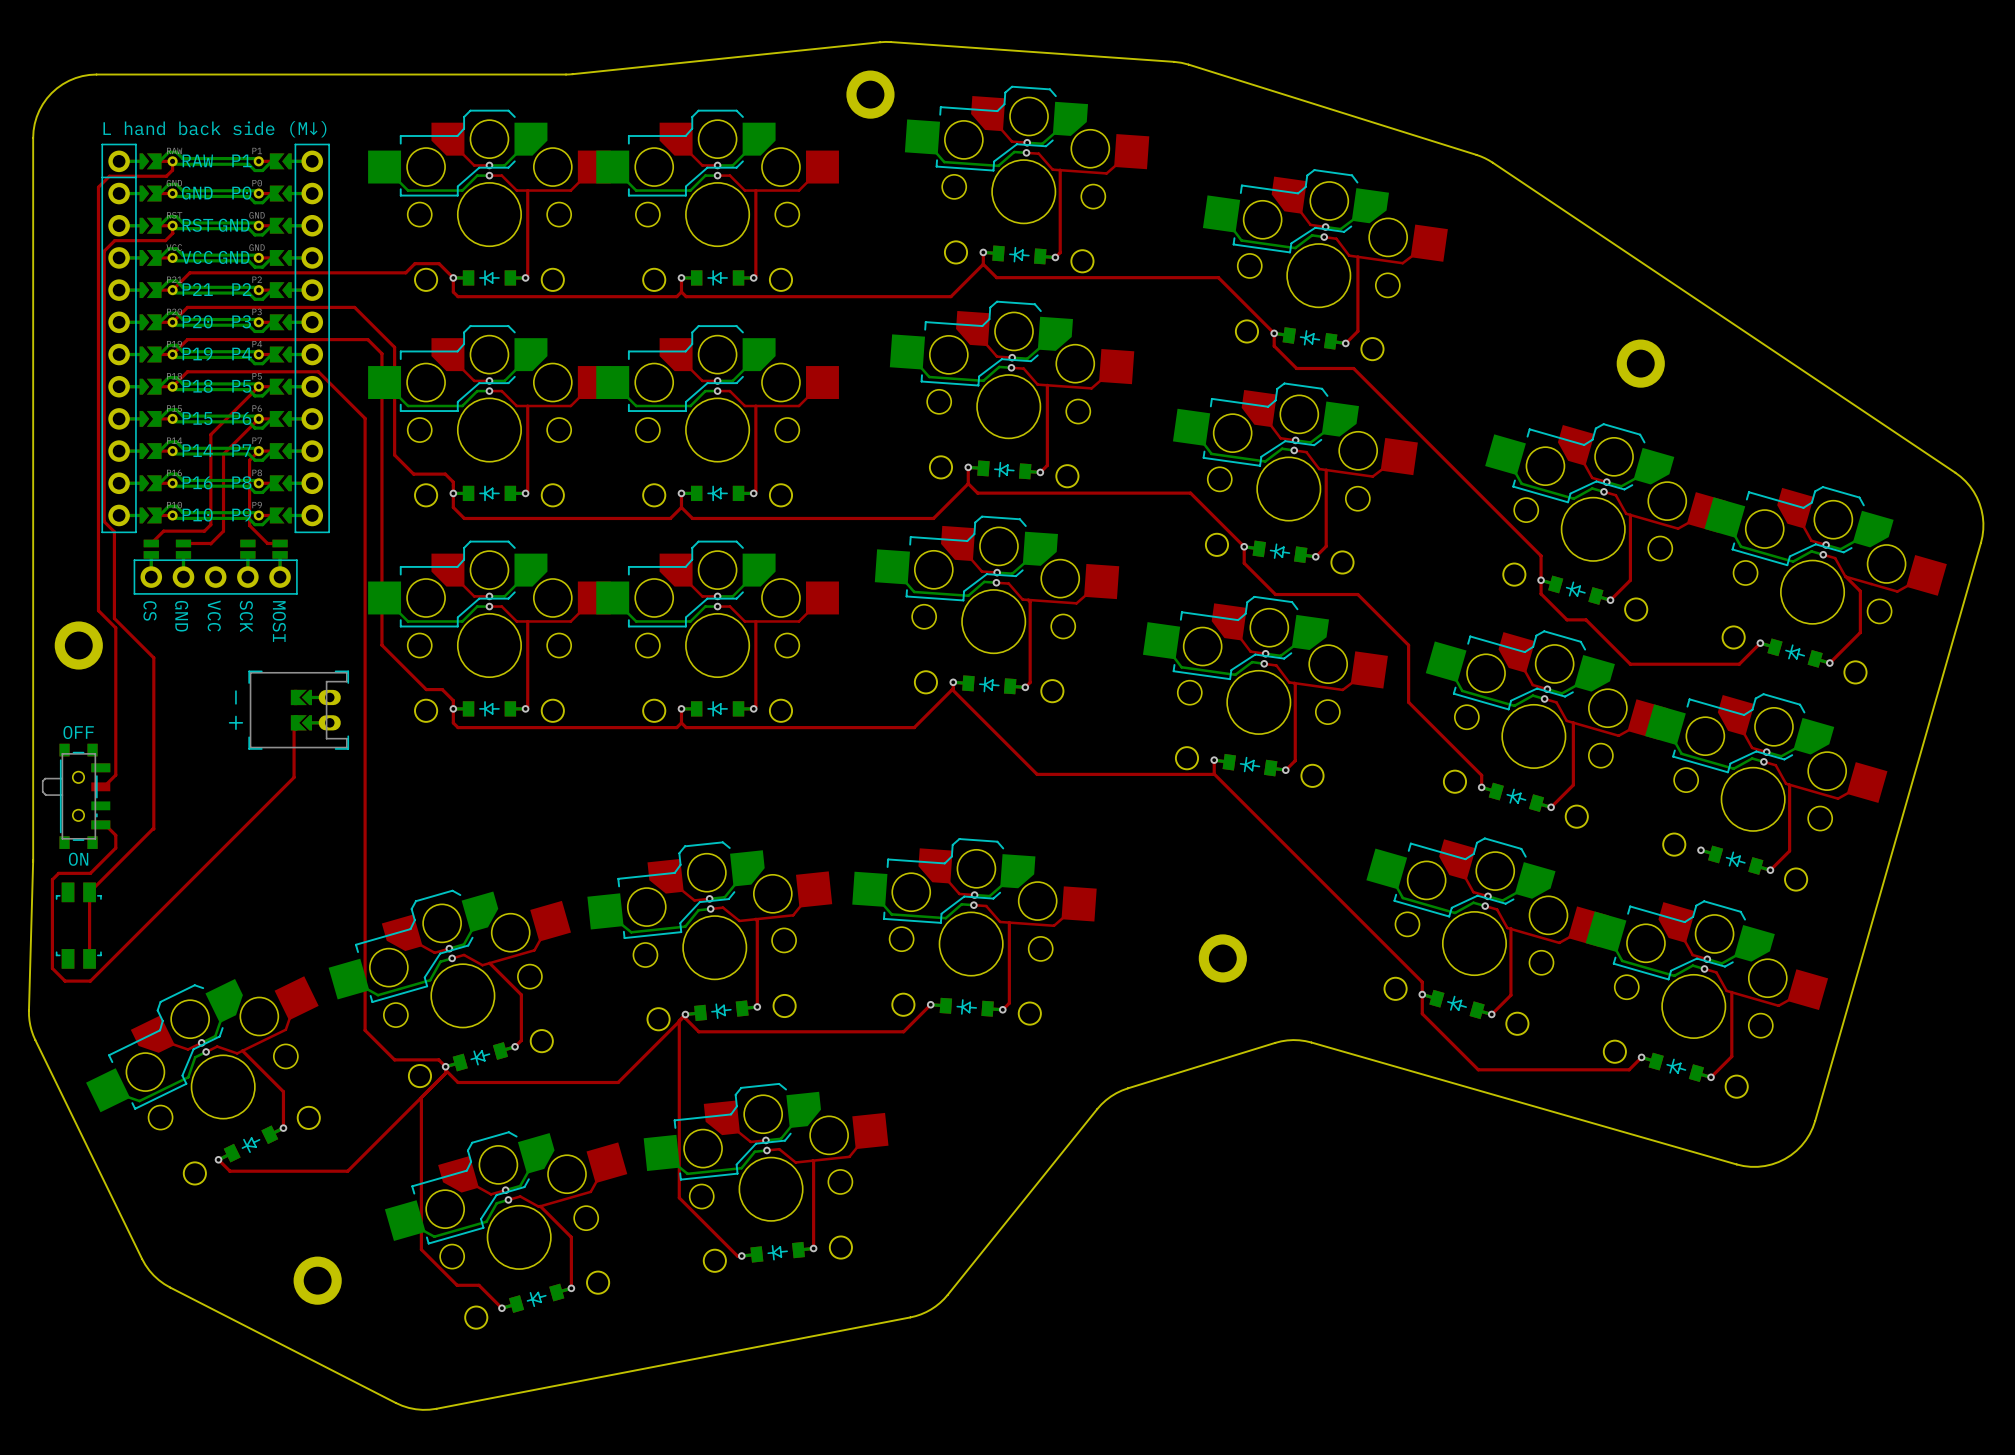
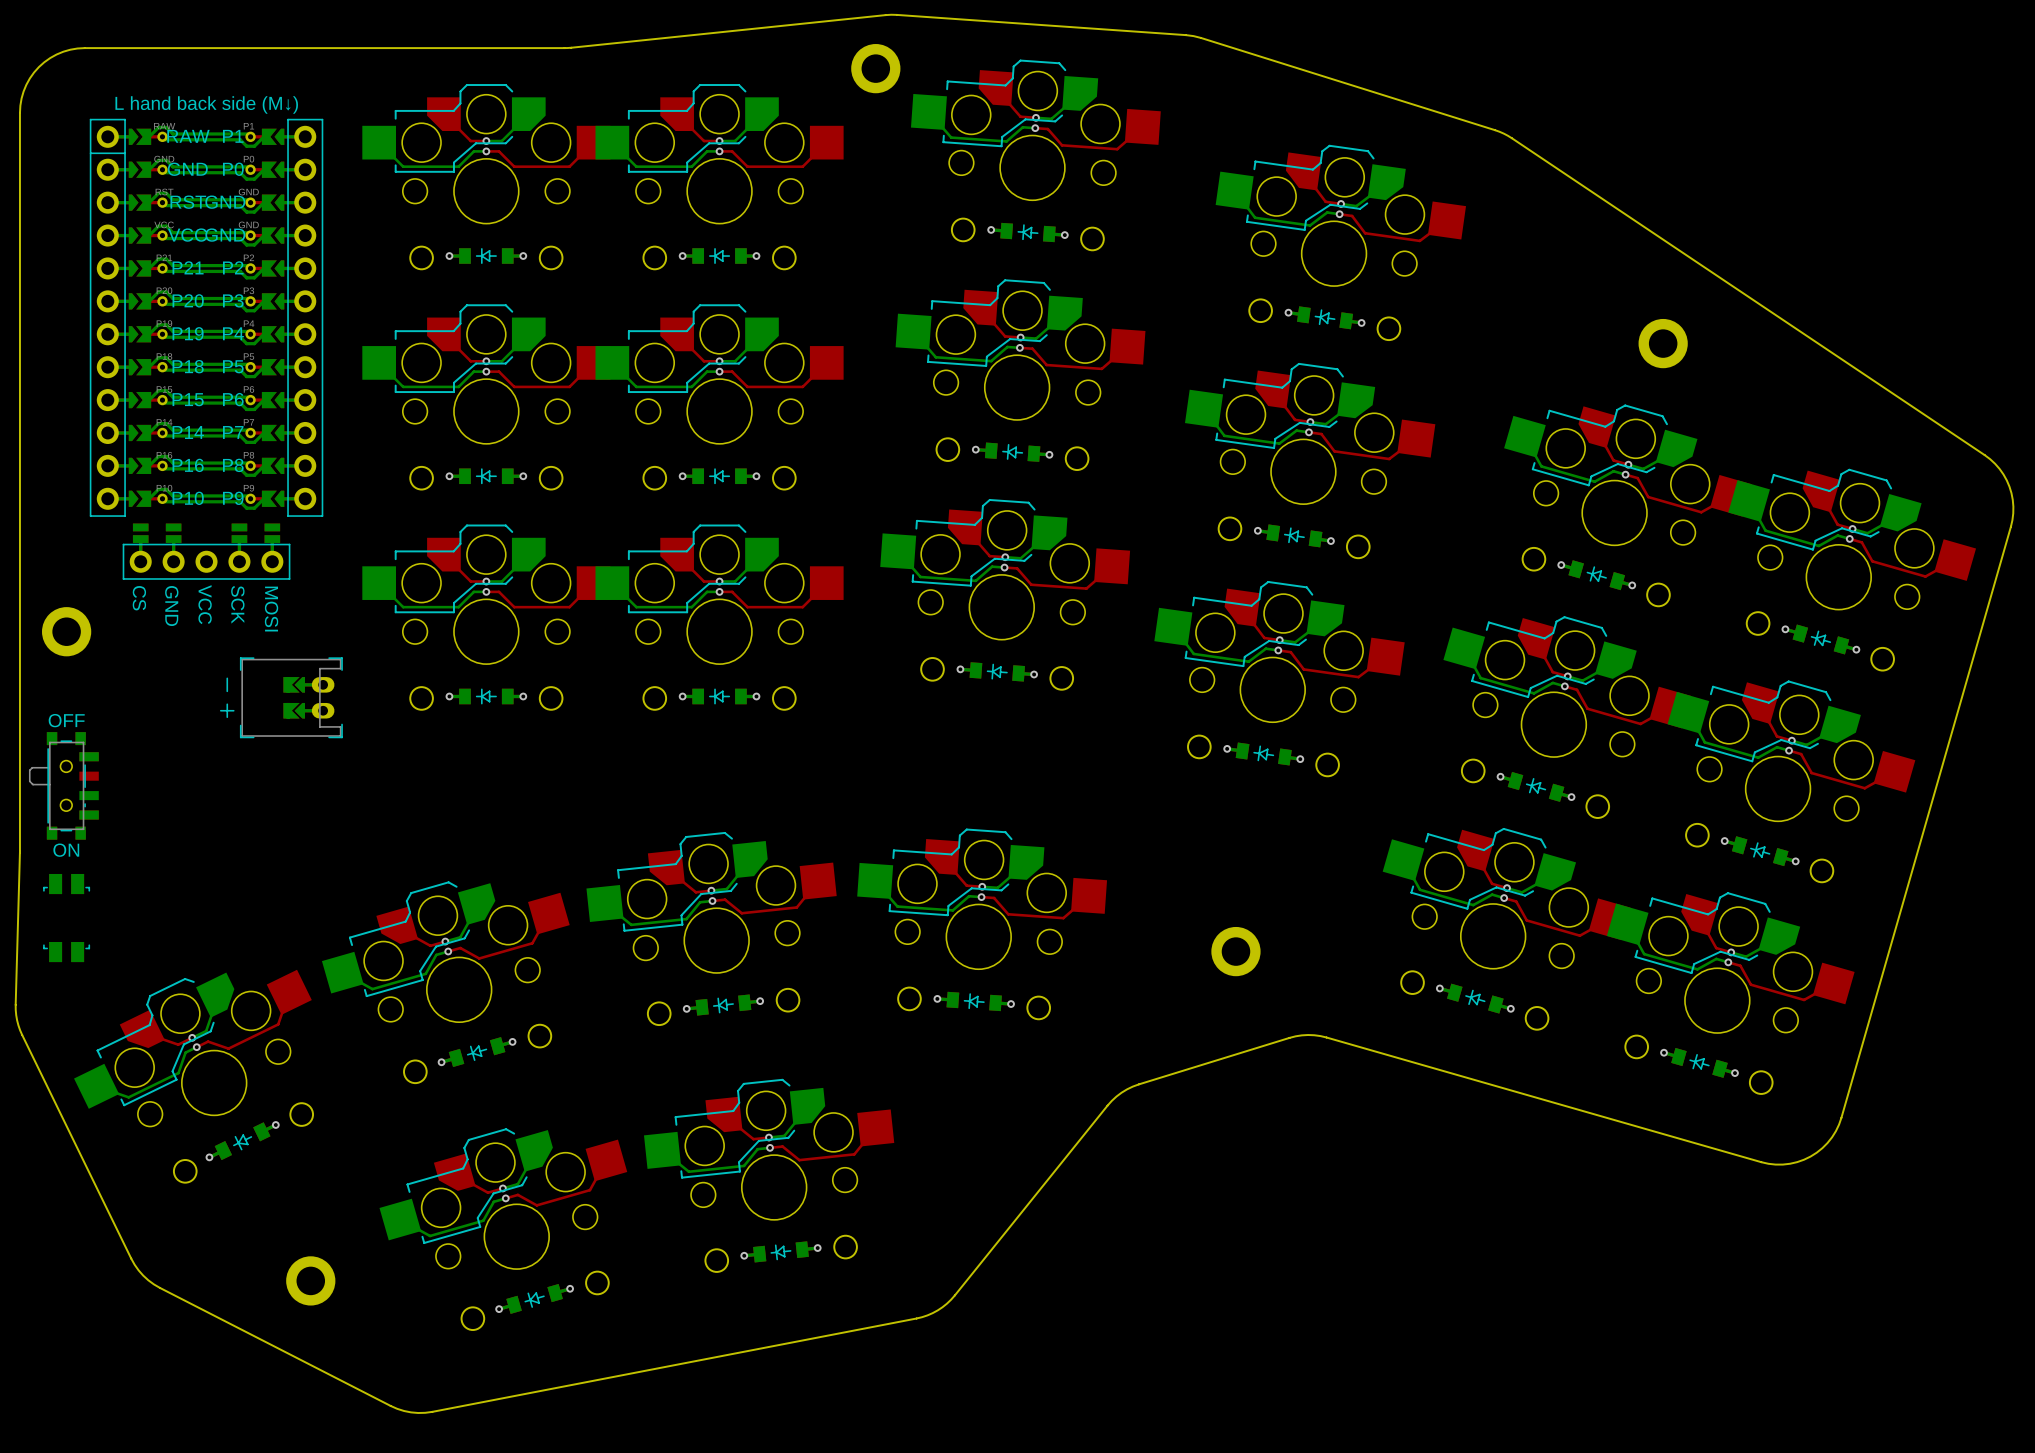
top track: (172, 161) (172, 170) (166, 176) (109, 176) (98, 187) (98, 610) (115, 627) (115, 775) (103, 786) (100, 786) -> none
top track: (1060, 170) (1060, 252) (1055, 257) -> none
top track: (527, 190) (527, 275) (525, 277) -> none
top track: (755, 190) (755, 275) (753, 277) -> none
top track: (172, 225) (172, 233) (165, 240) (114, 240) (104, 251) (104, 521) (114, 531) (114, 618) (153, 657) (153, 829) (89, 892) (89, 958) -> none
top track: (983, 252) (983, 264) -> none
top track: (1357, 256) (1357, 331) (1345, 343) -> none
top track: (983, 264) (996, 277) (1218, 277) (1274, 333) (1274, 346) (1296, 368) (1353, 368) (1541, 555) (1541, 593) (1567, 619) (1586, 619) (1630, 664) (1739, 664) (1760, 643) -> none
top track: (983, 264) (950, 296) (686, 296) (681, 291) -> none
top track: (681, 277) (681, 291) -> none
top track: (172, 290) (189, 272) (405, 272) (414, 263) (439, 263) (453, 277) (453, 291) (458, 296) (676, 296) (681, 291) -> none
top track: (172, 322) (187, 307) (354, 307) (394, 347) (394, 455) (413, 474) (445, 474) (453, 482) (453, 507) (464, 518) (670, 518) (681, 507) -> none
top track: (172, 354) (187, 339) (367, 339) (381, 353) (381, 645) (426, 689) (442, 689) (453, 700) (453, 722) (458, 727) (676, 727) (681, 722) -> none
top track: (1047, 385) (1047, 465) (1040, 472) -> none
top track: (172, 386) (187, 371) (318, 371) (365, 418) (365, 1030) (394, 1059) (438, 1059) (445, 1066) (445, 1073) (347, 1171) (229, 1171) -> none
top track: (258, 386) (210, 434) (210, 524) (204, 531) (163, 531) (151, 543) -> none
top track: (527, 406) (527, 491) (525, 493) -> none
top track: (755, 406) (755, 491) (753, 493) -> none
top track: (258, 418) (223, 454) (223, 531) (210, 543) (183, 543) -> none
top track: (258, 451) (249, 460) (249, 525) (267, 543) (280, 543) -> none
top track: (968, 467) (968, 483) -> none
top track: (1326, 470) (1326, 546) (1315, 556) -> none
top track: (968, 483) (977, 493) (1190, 493) (1244, 546) (1244, 563) (1275, 594) (1357, 594) (1408, 645) (1408, 702) (1481, 775) (1481, 787) -> none
top track: (968, 483) (933, 518) (692, 518) (681, 507) -> none
top track: (681, 493) (681, 507) -> none
top track: (1630, 514) (1630, 580) (1610, 600) -> none
top track: (1845, 576) (1860, 591) (1860, 632) (1829, 663) -> none
top track: (1028, 599) (1030, 601) (1030, 682) (1025, 687) -> none
top track: (527, 621) (527, 706) (525, 708) -> none
top track: (755, 621) (755, 706) (753, 708) -> none
top track: (953, 682) (953, 688) (914, 727) (686, 727) (681, 722) -> none
top track: (1294, 683) (1295, 760) (1285, 770) -> none
top track: (952, 689) (1037, 774) (1214, 774) -> none
top track: (679, 707) (681, 722) -> none
top track: (294, 722) (294, 777) (90, 981) (65, 981) (52, 968) (52, 879) (58, 873) (90, 873) (115, 848) (115, 835) (105, 824) (100, 824) -> none
top track: (1573, 722) (1573, 785) (1551, 807) -> none
top track: (1214, 760) (1214, 774) -> none
top track: (1214, 774) (1422, 982) (1422, 1013) (1478, 1069) (1629, 1069) (1641, 1057) -> none
top track: (1788, 784) (1789, 851) (1770, 870) -> none
top track: (755, 919) (757, 1006) -> none
top track: (1009, 922) (1009, 1003) (1002, 1009) -> none
top track: (1510, 928) (1510, 995) (1491, 1014) -> none
top track: (489, 963) (521, 994) (521, 1040) (515, 1046) -> none
top track: (1731, 992) (1731, 1056) (1711, 1077) -> none
top track: (930, 1004) (903, 1031) (698, 1031) (685, 1018) (685, 1014) (679, 1020) (679, 1197) (737, 1256) (741, 1256) -> none
top track: (685, 1015) (618, 1082) (458, 1082) (445, 1070) -> none
top track: (242, 1050) (283, 1091) (283, 1128) -> none
top track: (421, 1097) (421, 1249) (457, 1285) (478, 1285) (501, 1308) -> none
top track: (218, 1159) (229, 1171) -> none
top track: (812, 1160) (813, 1248) -> none
top track: (540, 1206) (571, 1237) (571, 1288) -> none

